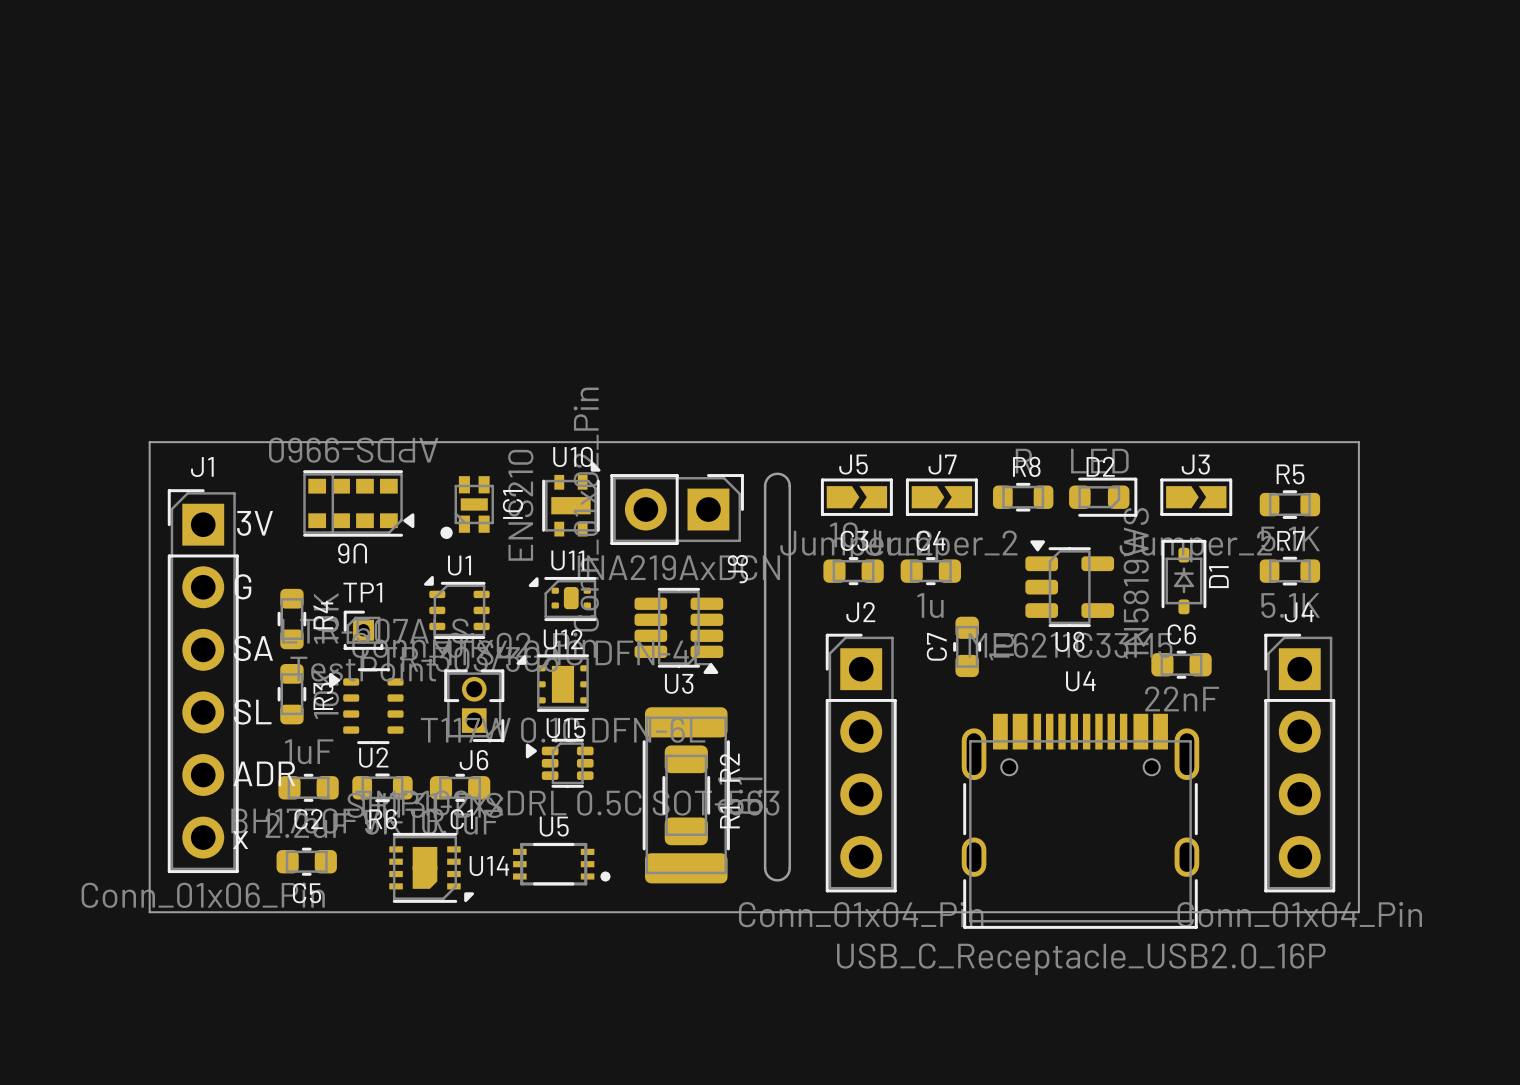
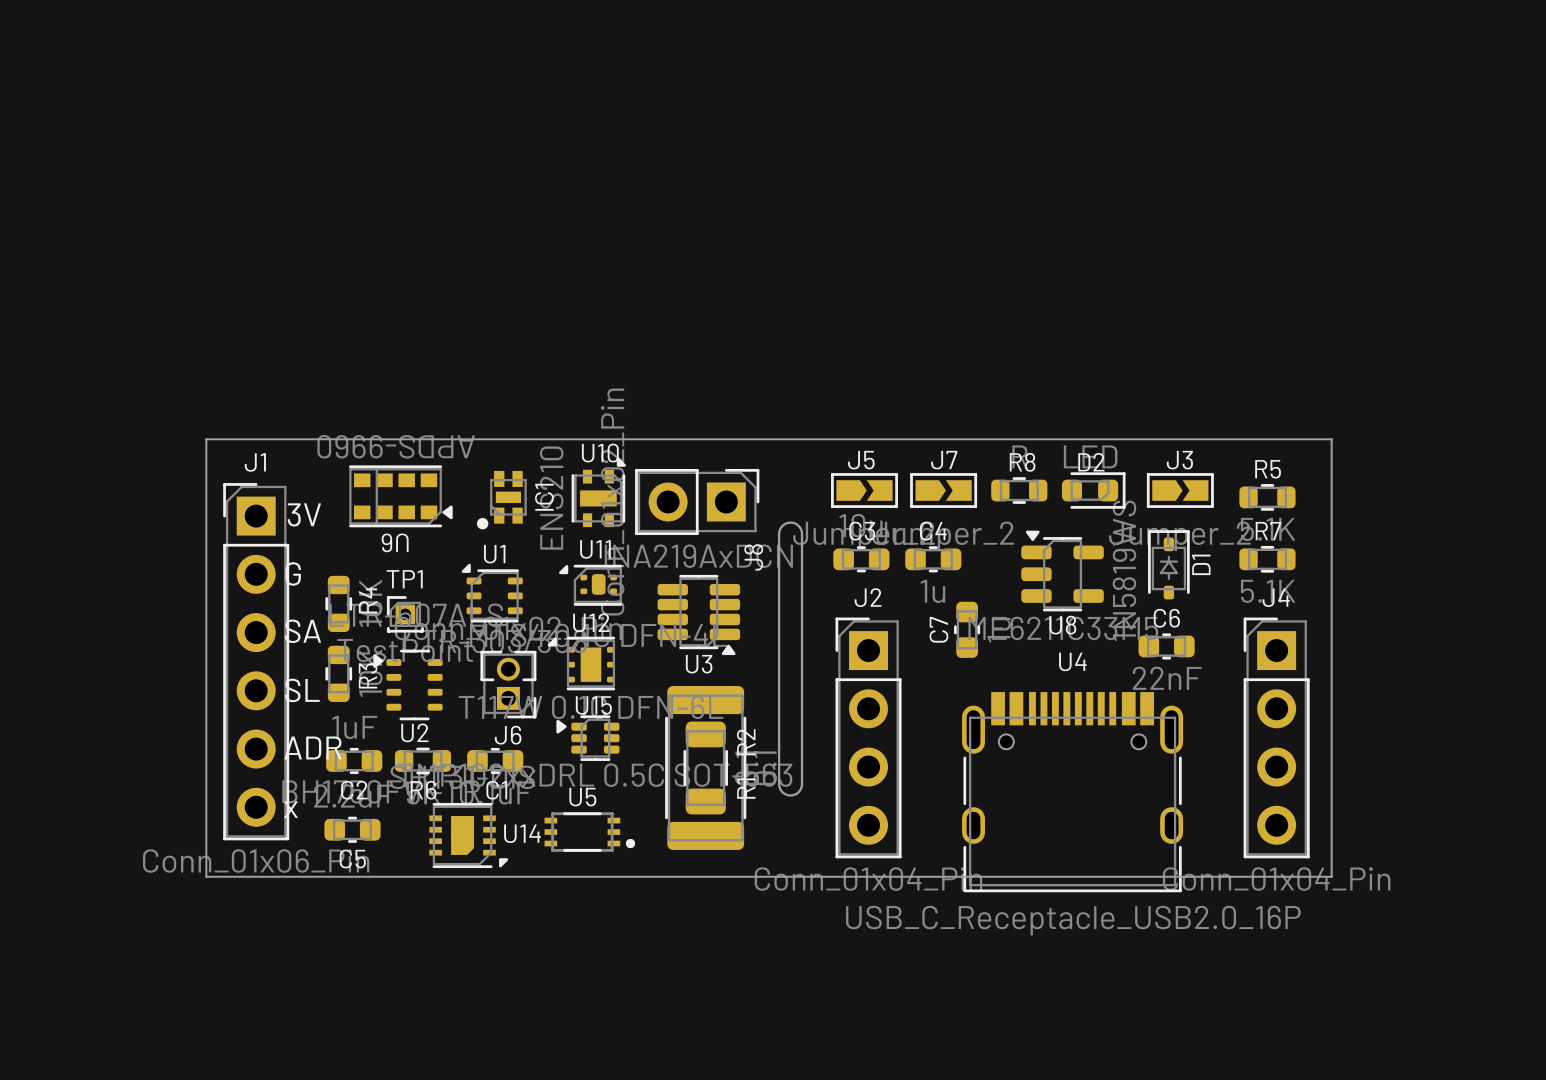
board edge: (765, 544) (765, 484) (768, 477) (777, 473) (786, 477) (789, 484) (789, 544) -> (779, 534) (782, 525) (790, 522) (798, 525) (802, 534)
board edge: (765, 812) (765, 869) (768, 876) (777, 880) (786, 876) (789, 869) (789, 812) -> (779, 784) (781, 791) (790, 795) (798, 792) (802, 784)

